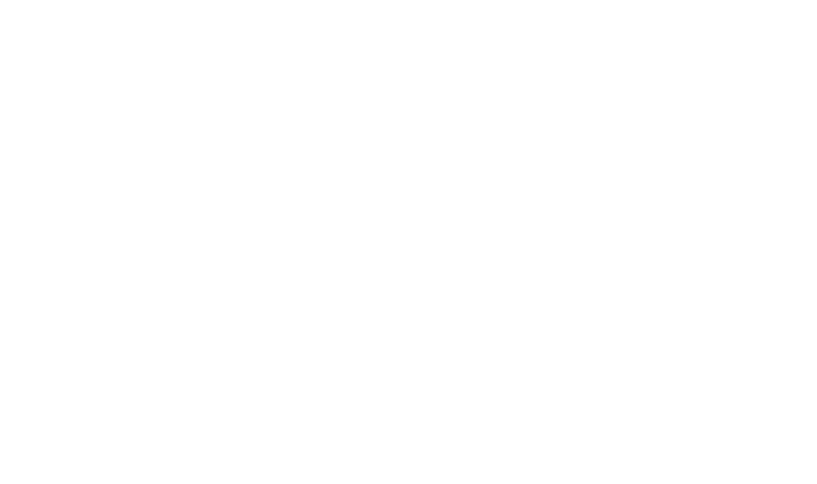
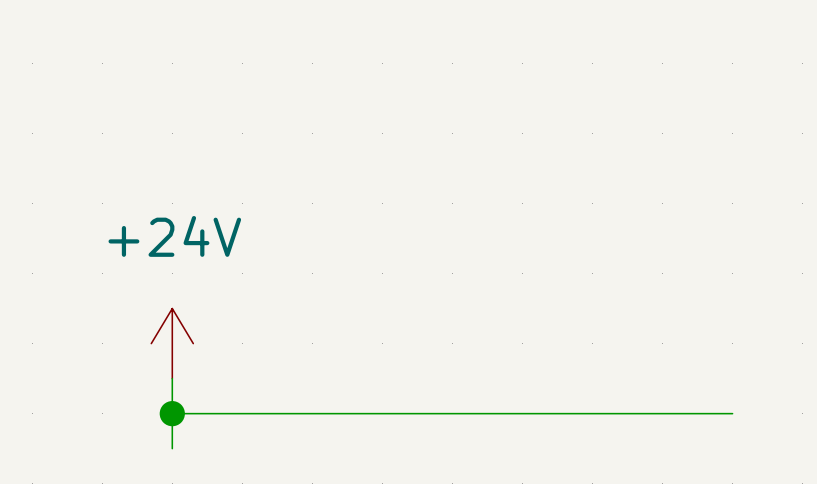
power symbol: none -> +24V (172, 343)
wire: none -> (172, 378) (172, 448)
wire: none -> (172, 413) (732, 413)
junction: none -> (172, 413)

